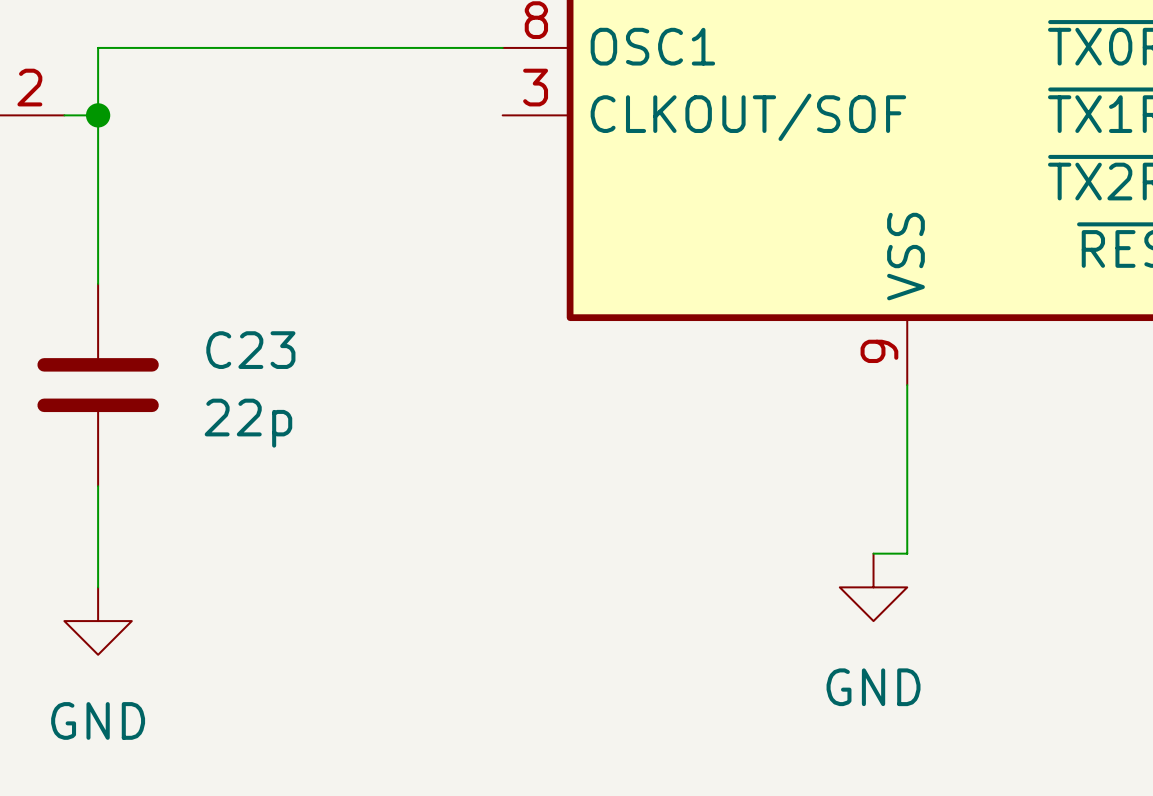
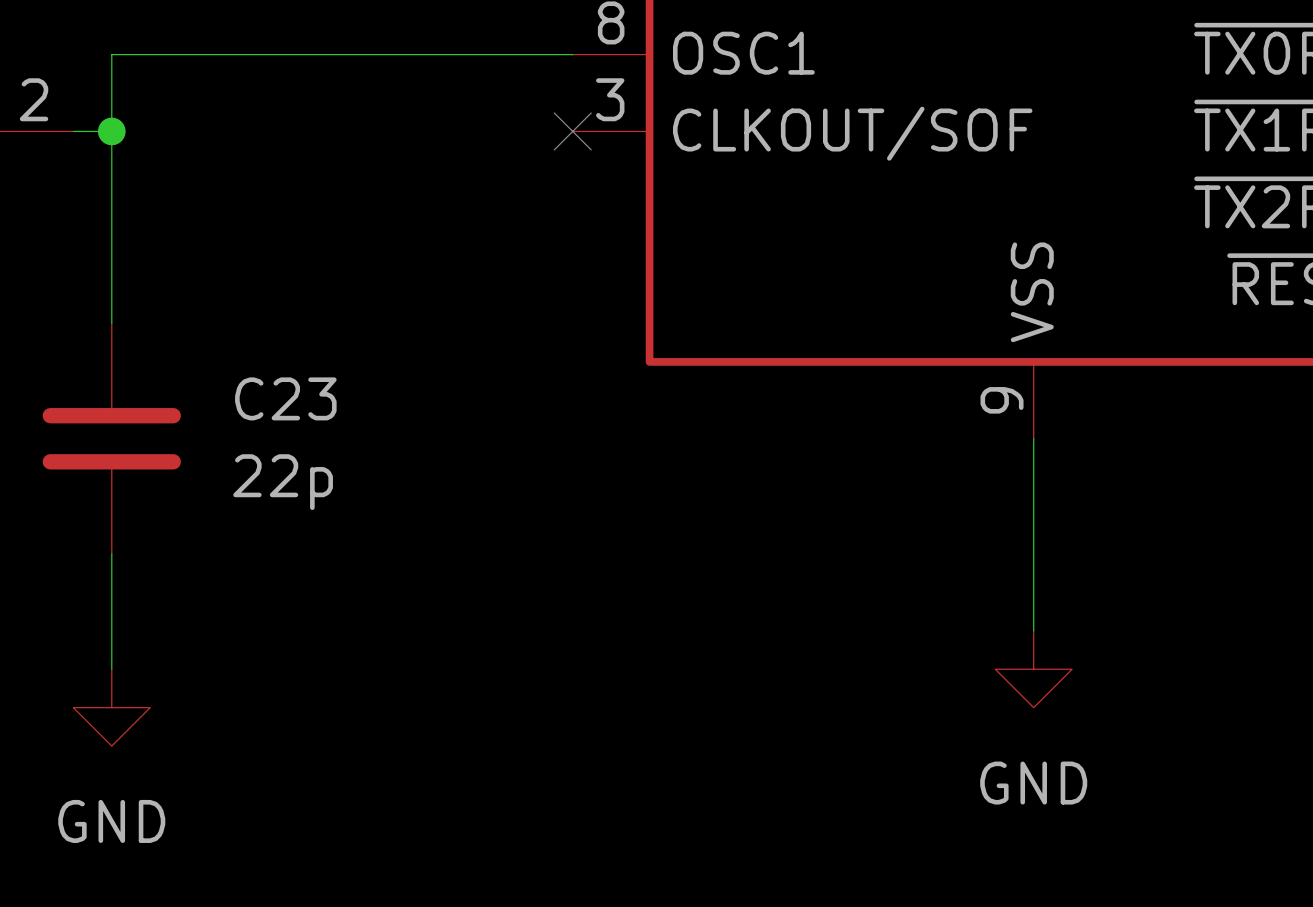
no-connect mark: none -> (572, 131)
wire: (873, 553) (907, 553) -> none
power symbol position: GND (873, 587) -> GND (1033, 669)

